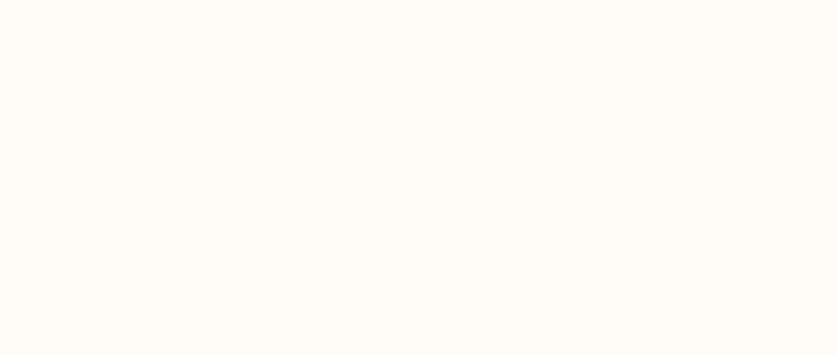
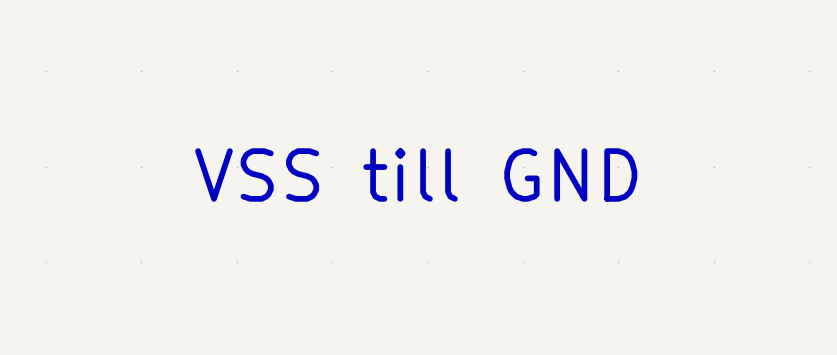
text: none -> VSS till GND (416, 174)

